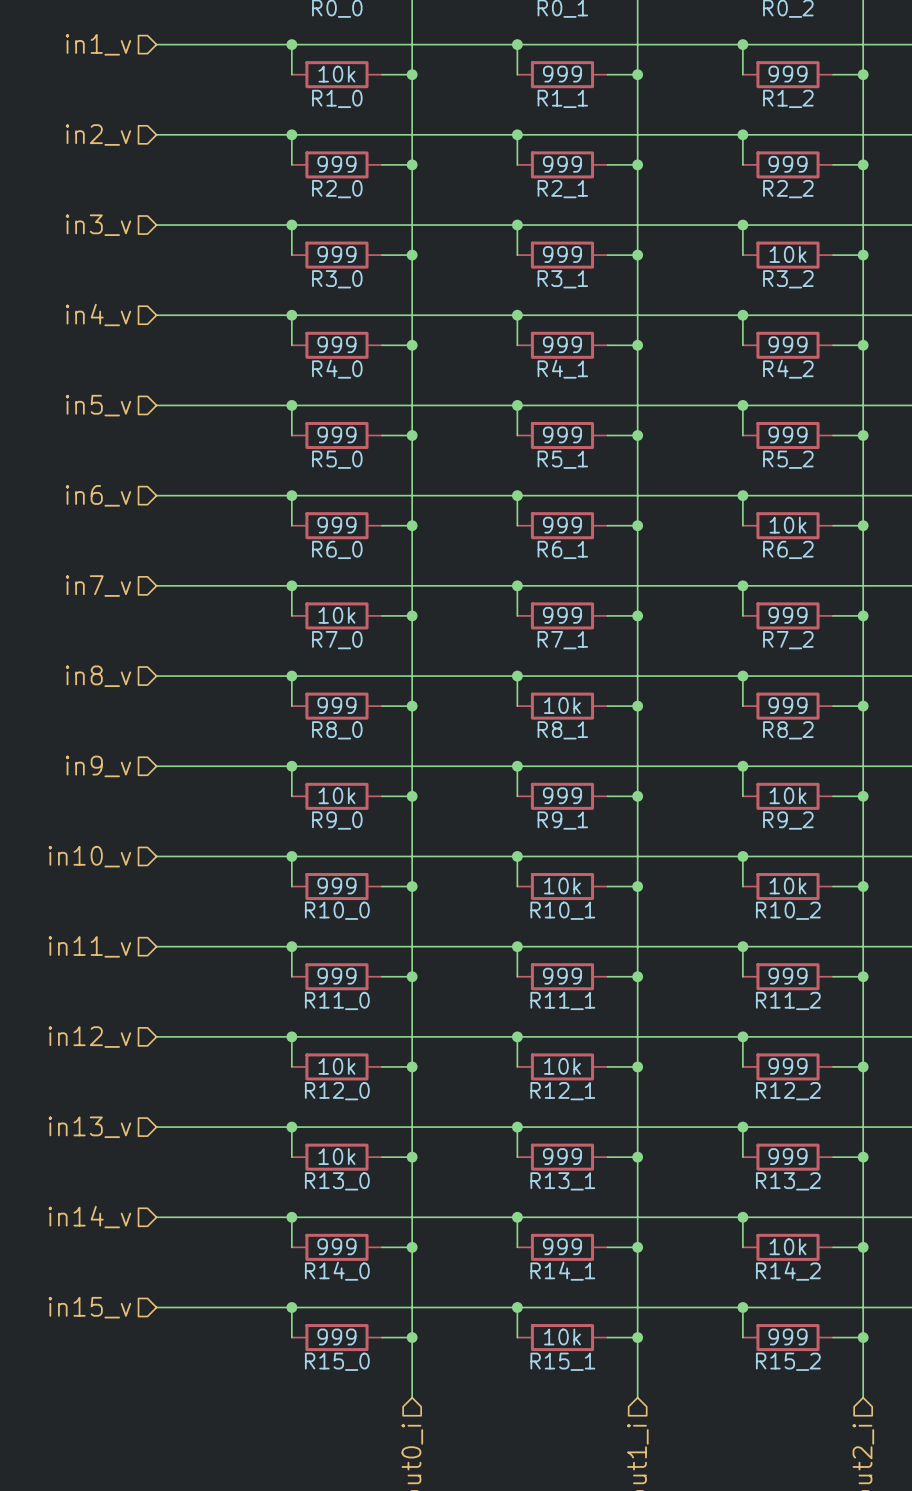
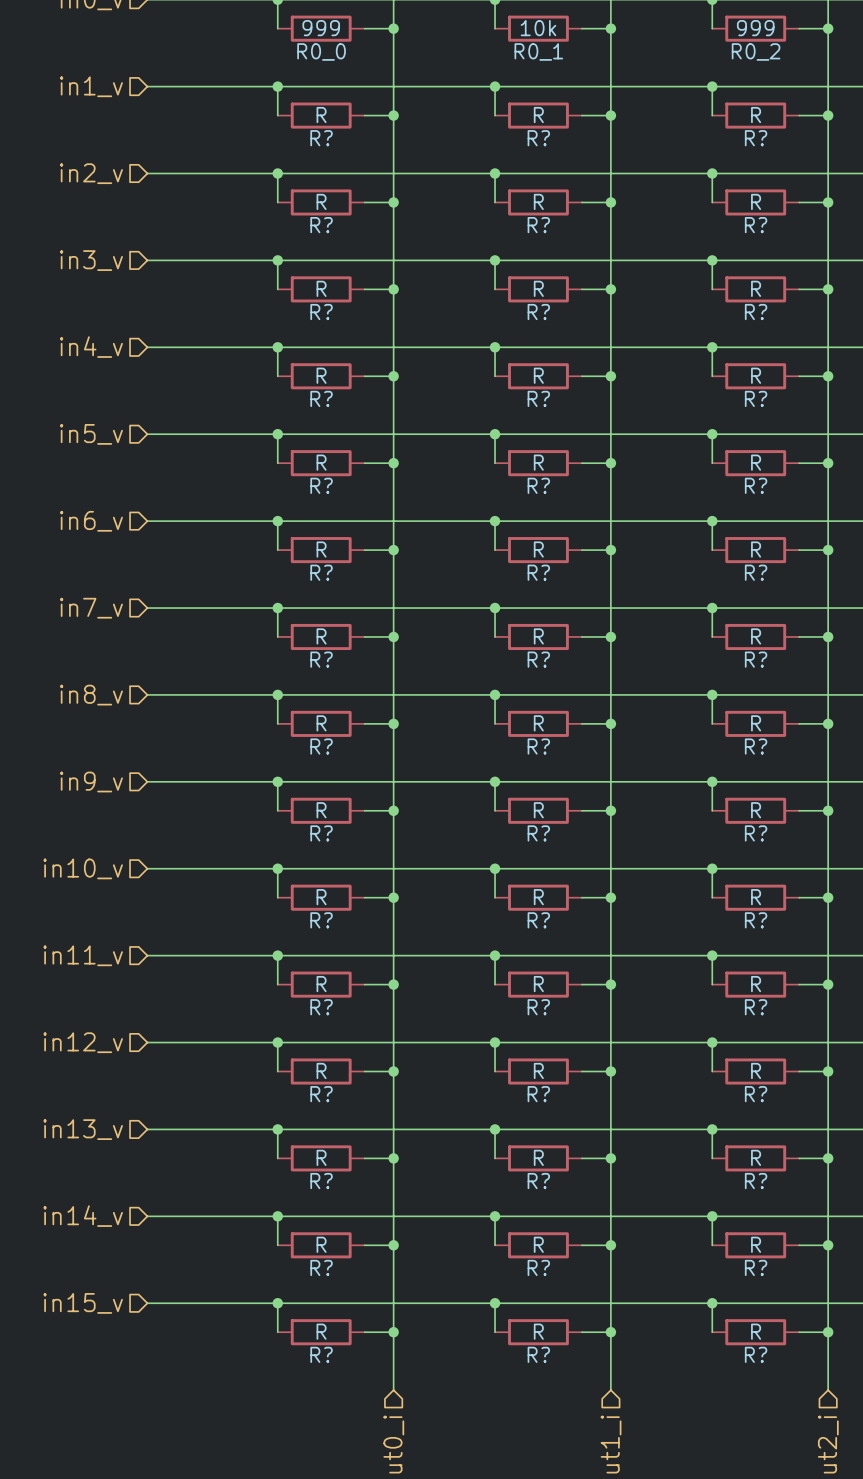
R1_0 value: 10k (336, 74) -> R (321, 115)
R1_1 value: 999 (562, 74) -> R (538, 115)
R1_2 value: 999 (788, 74) -> R (756, 115)
R1_0 name: R1_0 (337, 98) -> R? (321, 138)
R1_1 name: R1_1 (562, 98) -> R? (538, 138)
R1_2 name: R1_2 (788, 98) -> R? (756, 138)
R2_0 value: 999 (336, 164) -> R (321, 201)
R2_1 value: 999 (562, 164) -> R (538, 201)
R2_2 value: 999 (788, 164) -> R (756, 201)
R2_0 name: R2_0 (337, 189) -> R? (321, 225)
R2_1 name: R2_1 (562, 189) -> R? (538, 225)
R2_2 name: R2_2 (788, 189) -> R? (756, 225)
R3_0 value: 999 (336, 254) -> R (321, 288)
R3_1 value: 999 (562, 254) -> R (538, 288)
R3_2 value: 10k (788, 254) -> R (756, 288)
R3_0 name: R3_0 (337, 279) -> R? (321, 312)
R3_1 name: R3_1 (562, 279) -> R? (538, 312)
R3_2 name: R3_2 (788, 279) -> R? (756, 312)
R4_0 value: 999 (336, 344) -> R (321, 375)
R4_1 value: 999 (562, 344) -> R (538, 375)
R4_2 value: 999 (788, 344) -> R (756, 375)
R4_0 name: R4_0 (337, 369) -> R? (321, 398)
R4_1 name: R4_1 (562, 369) -> R? (538, 398)
R4_2 name: R4_2 (788, 369) -> R? (756, 398)
R5_0 value: 999 (336, 434) -> R (321, 462)
R5_1 value: 999 (562, 434) -> R (538, 462)
R5_2 value: 999 (788, 434) -> R (756, 462)
R5_0 name: R5_0 (337, 459) -> R? (321, 485)
R5_1 name: R5_1 (562, 459) -> R? (538, 485)
R5_2 name: R5_2 (788, 459) -> R? (756, 485)
R6_0 value: 999 (336, 525) -> R (321, 549)
R6_1 value: 999 (562, 525) -> R (538, 549)
R6_2 value: 10k (788, 525) -> R (756, 549)
R6_0 name: R6_0 (337, 549) -> R? (321, 572)
R6_1 name: R6_1 (562, 549) -> R? (538, 572)
R6_2 name: R6_2 (788, 549) -> R? (756, 572)
R7_0 value: 10k (336, 615) -> R (321, 636)
R7_1 value: 999 (562, 615) -> R (538, 636)
R7_2 value: 999 (788, 615) -> R (756, 636)
R7_0 name: R7_0 (337, 640) -> R? (321, 659)
R7_1 name: R7_1 (562, 640) -> R? (538, 659)
R7_2 name: R7_2 (788, 640) -> R? (756, 659)
R8_0 value: 999 (336, 705) -> R (321, 723)
R8_1 value: 10k (562, 705) -> R (538, 723)
R8_2 value: 999 (788, 705) -> R (756, 723)
R8_0 name: R8_0 (337, 730) -> R? (321, 746)
R8_1 name: R8_1 (562, 730) -> R? (538, 746)
R8_2 name: R8_2 (788, 730) -> R? (756, 746)
R9_0 value: 10k (336, 795) -> R (321, 810)
R9_1 value: 999 (562, 795) -> R (538, 810)
R9_2 value: 10k (788, 795) -> R (756, 810)
R9_0 name: R9_0 (337, 820) -> R? (321, 833)
R9_1 name: R9_1 (562, 820) -> R? (538, 833)
R9_2 name: R9_2 (788, 820) -> R? (756, 833)
R10_0 value: 999 (336, 885) -> R (321, 897)
R10_1 value: 10k (562, 885) -> R (538, 897)
R10_2 value: 10k (788, 885) -> R (756, 897)
R10_0 name: R10_0 (337, 910) -> R? (321, 920)
R10_1 name: R10_1 (562, 910) -> R? (538, 920)
R10_2 name: R10_2 (788, 910) -> R? (756, 920)
R11_0 value: 999 (336, 976) -> R (321, 984)
R11_1 value: 999 (562, 976) -> R (538, 984)
R11_2 value: 999 (788, 976) -> R (756, 984)
R11_0 name: R11_0 (337, 1000) -> R? (321, 1007)
R11_1 name: R11_1 (562, 1000) -> R? (538, 1007)
R11_2 name: R11_2 (788, 1000) -> R? (756, 1007)
R12_0 value: 10k (336, 1066) -> R (321, 1070)
R12_1 value: 10k (562, 1066) -> R (538, 1070)
R12_2 value: 999 (788, 1066) -> R (756, 1070)
R12_0 name: R12_0 (337, 1091) -> R? (321, 1094)
R12_1 name: R12_1 (562, 1091) -> R? (538, 1094)
R12_2 name: R12_2 (788, 1091) -> R? (756, 1094)
R13_0 value: 10k (336, 1156) -> R (321, 1157)
R13_1 value: 999 (562, 1156) -> R (538, 1157)
R13_2 value: 999 (788, 1156) -> R (756, 1157)
R13_0 name: R13_0 (337, 1181) -> R? (321, 1181)
R13_1 name: R13_1 (562, 1181) -> R? (538, 1181)
R13_2 name: R13_2 (788, 1181) -> R? (756, 1181)
R14_0 value: 999 (336, 1246) -> R (321, 1244)
R14_1 value: 999 (562, 1246) -> R (538, 1244)
R14_2 value: 10k (788, 1246) -> R (756, 1244)
R14_0 name: R14_0 (337, 1271) -> R? (321, 1267)
R14_1 name: R14_1 (562, 1271) -> R? (538, 1267)
R14_2 name: R14_2 (788, 1271) -> R? (756, 1267)
R15_0 value: 999 (336, 1337) -> R (321, 1331)
R15_1 value: 10k (562, 1337) -> R (538, 1331)
R15_2 value: 999 (788, 1337) -> R (756, 1331)
R15_0 name: R15_0 (337, 1361) -> R? (321, 1354)
R15_1 name: R15_1 (562, 1361) -> R? (538, 1354)
R15_2 name: R15_2 (788, 1361) -> R? (756, 1354)

